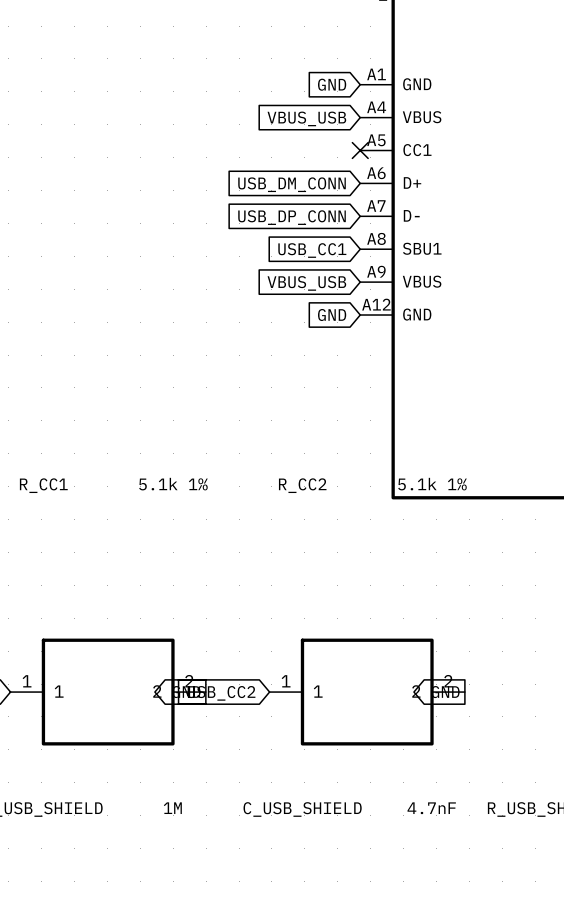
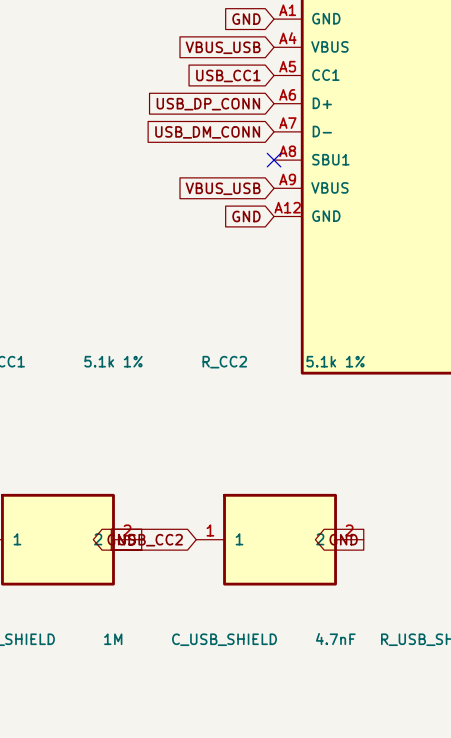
no-connect mark: (360, 150) -> none
global label: USB_DM_CONN (292, 184) -> USB_DP_CONN (208, 104)
global label: USB_DP_CONN (292, 217) -> USB_DM_CONN (207, 132)
no-connect mark: none -> (274, 160)
global label position: USB_CC1 (312, 250) -> USB_CC1 (228, 75)

